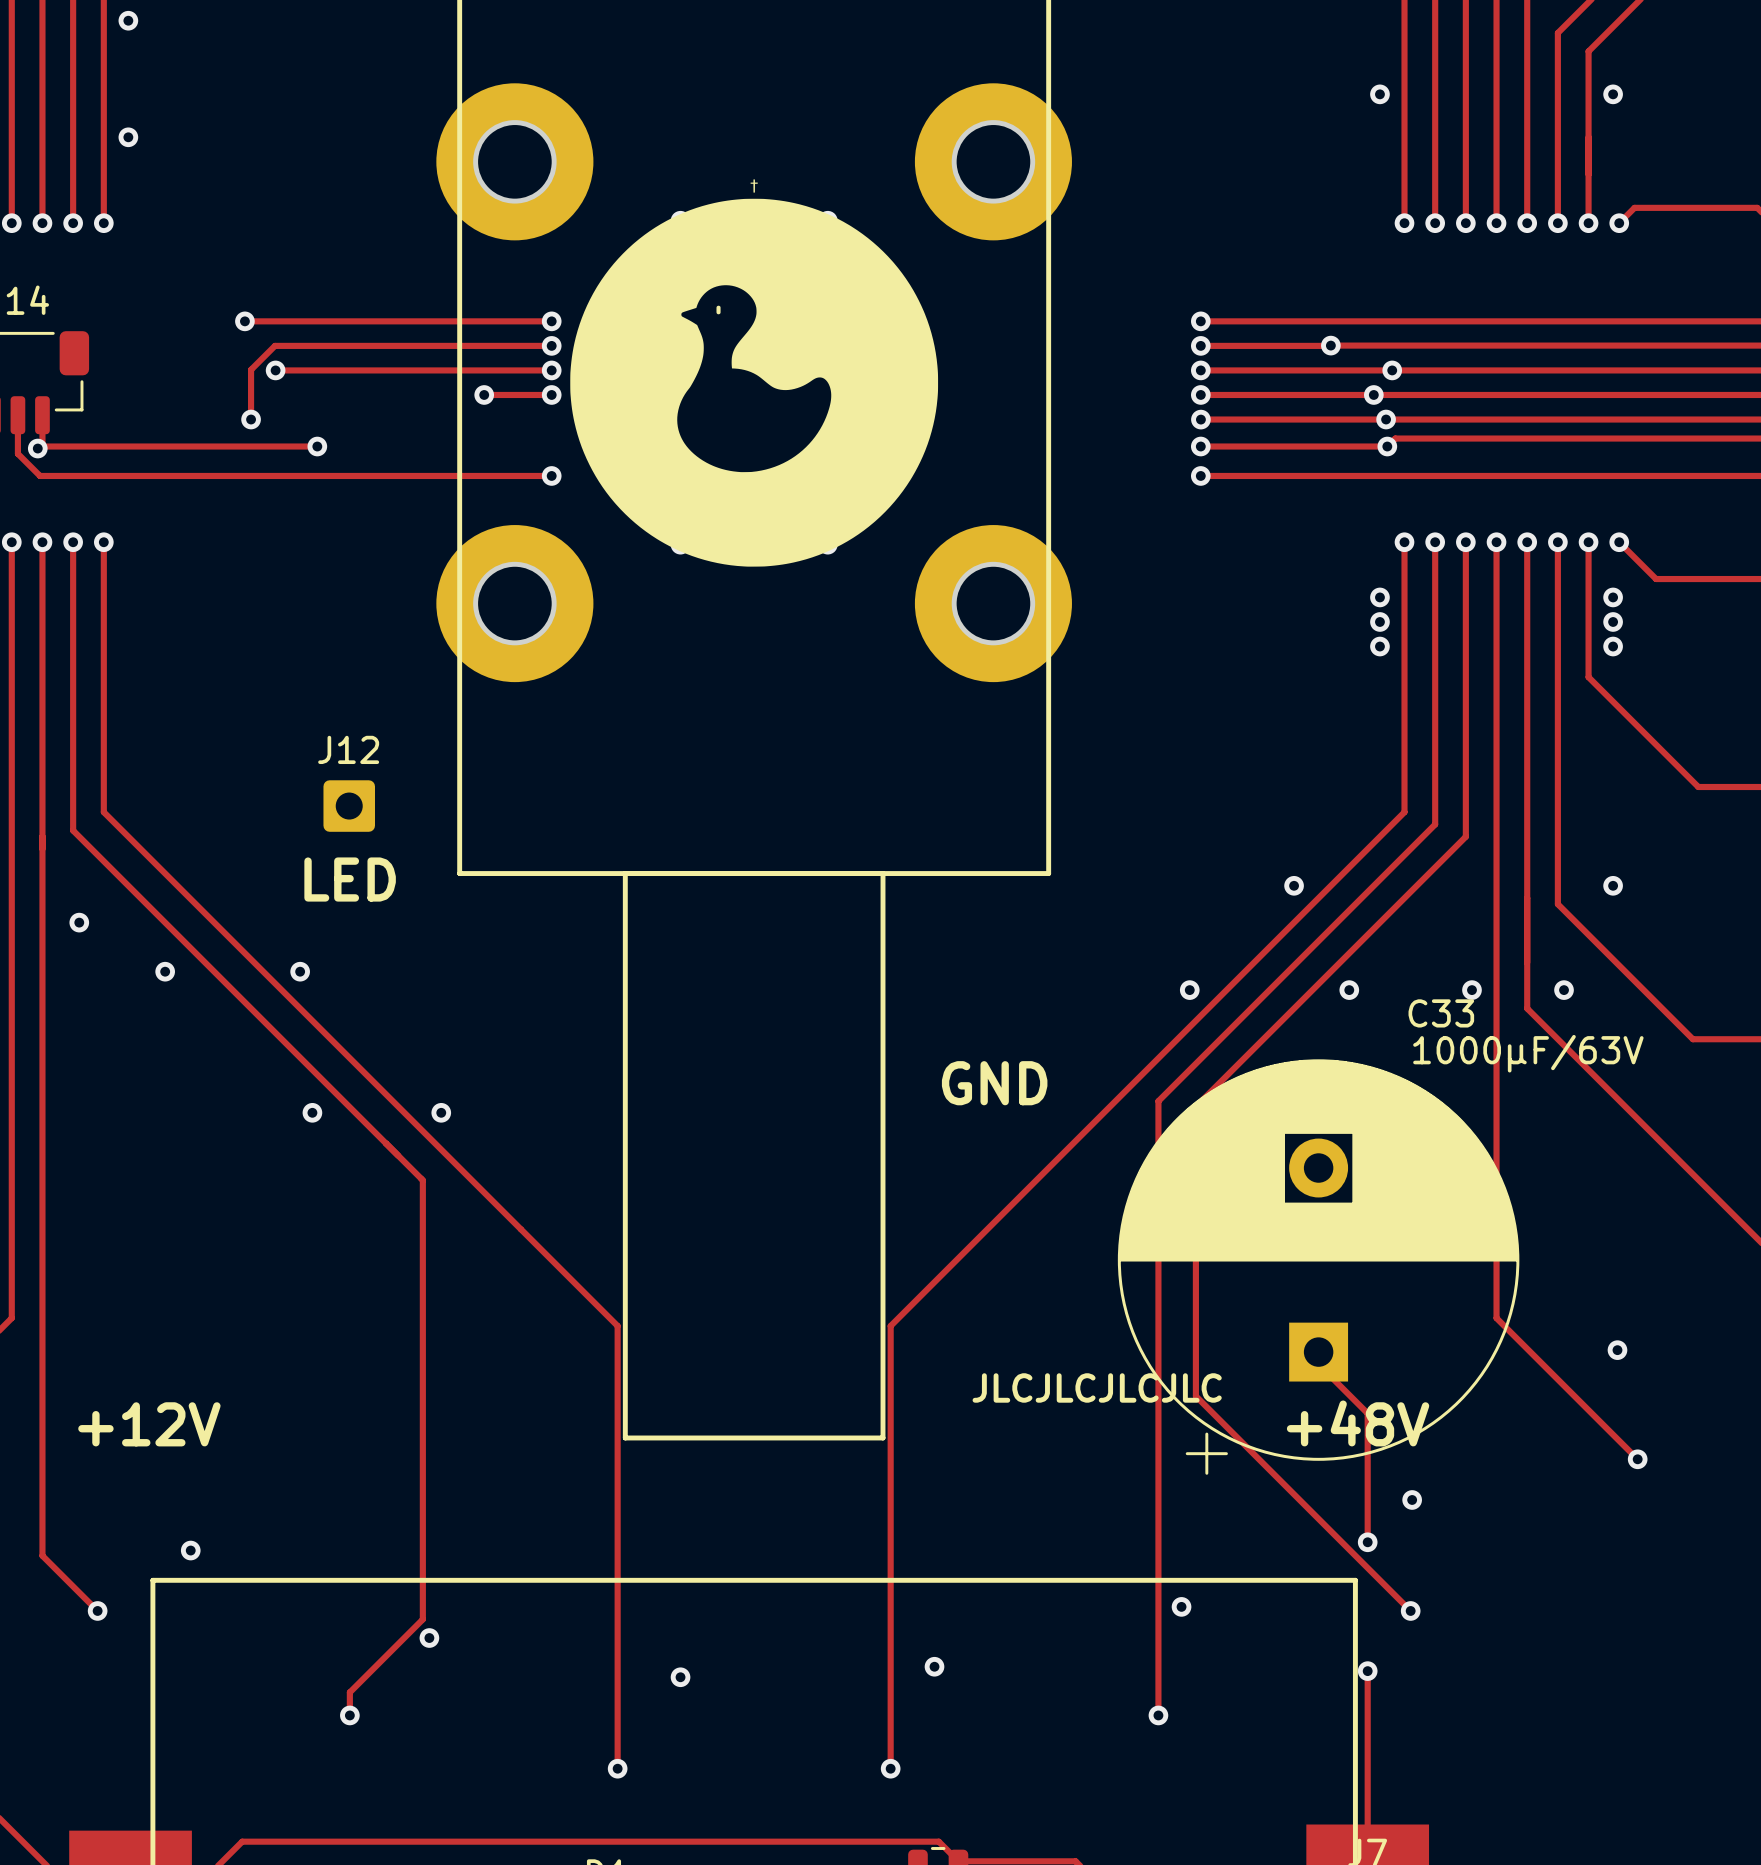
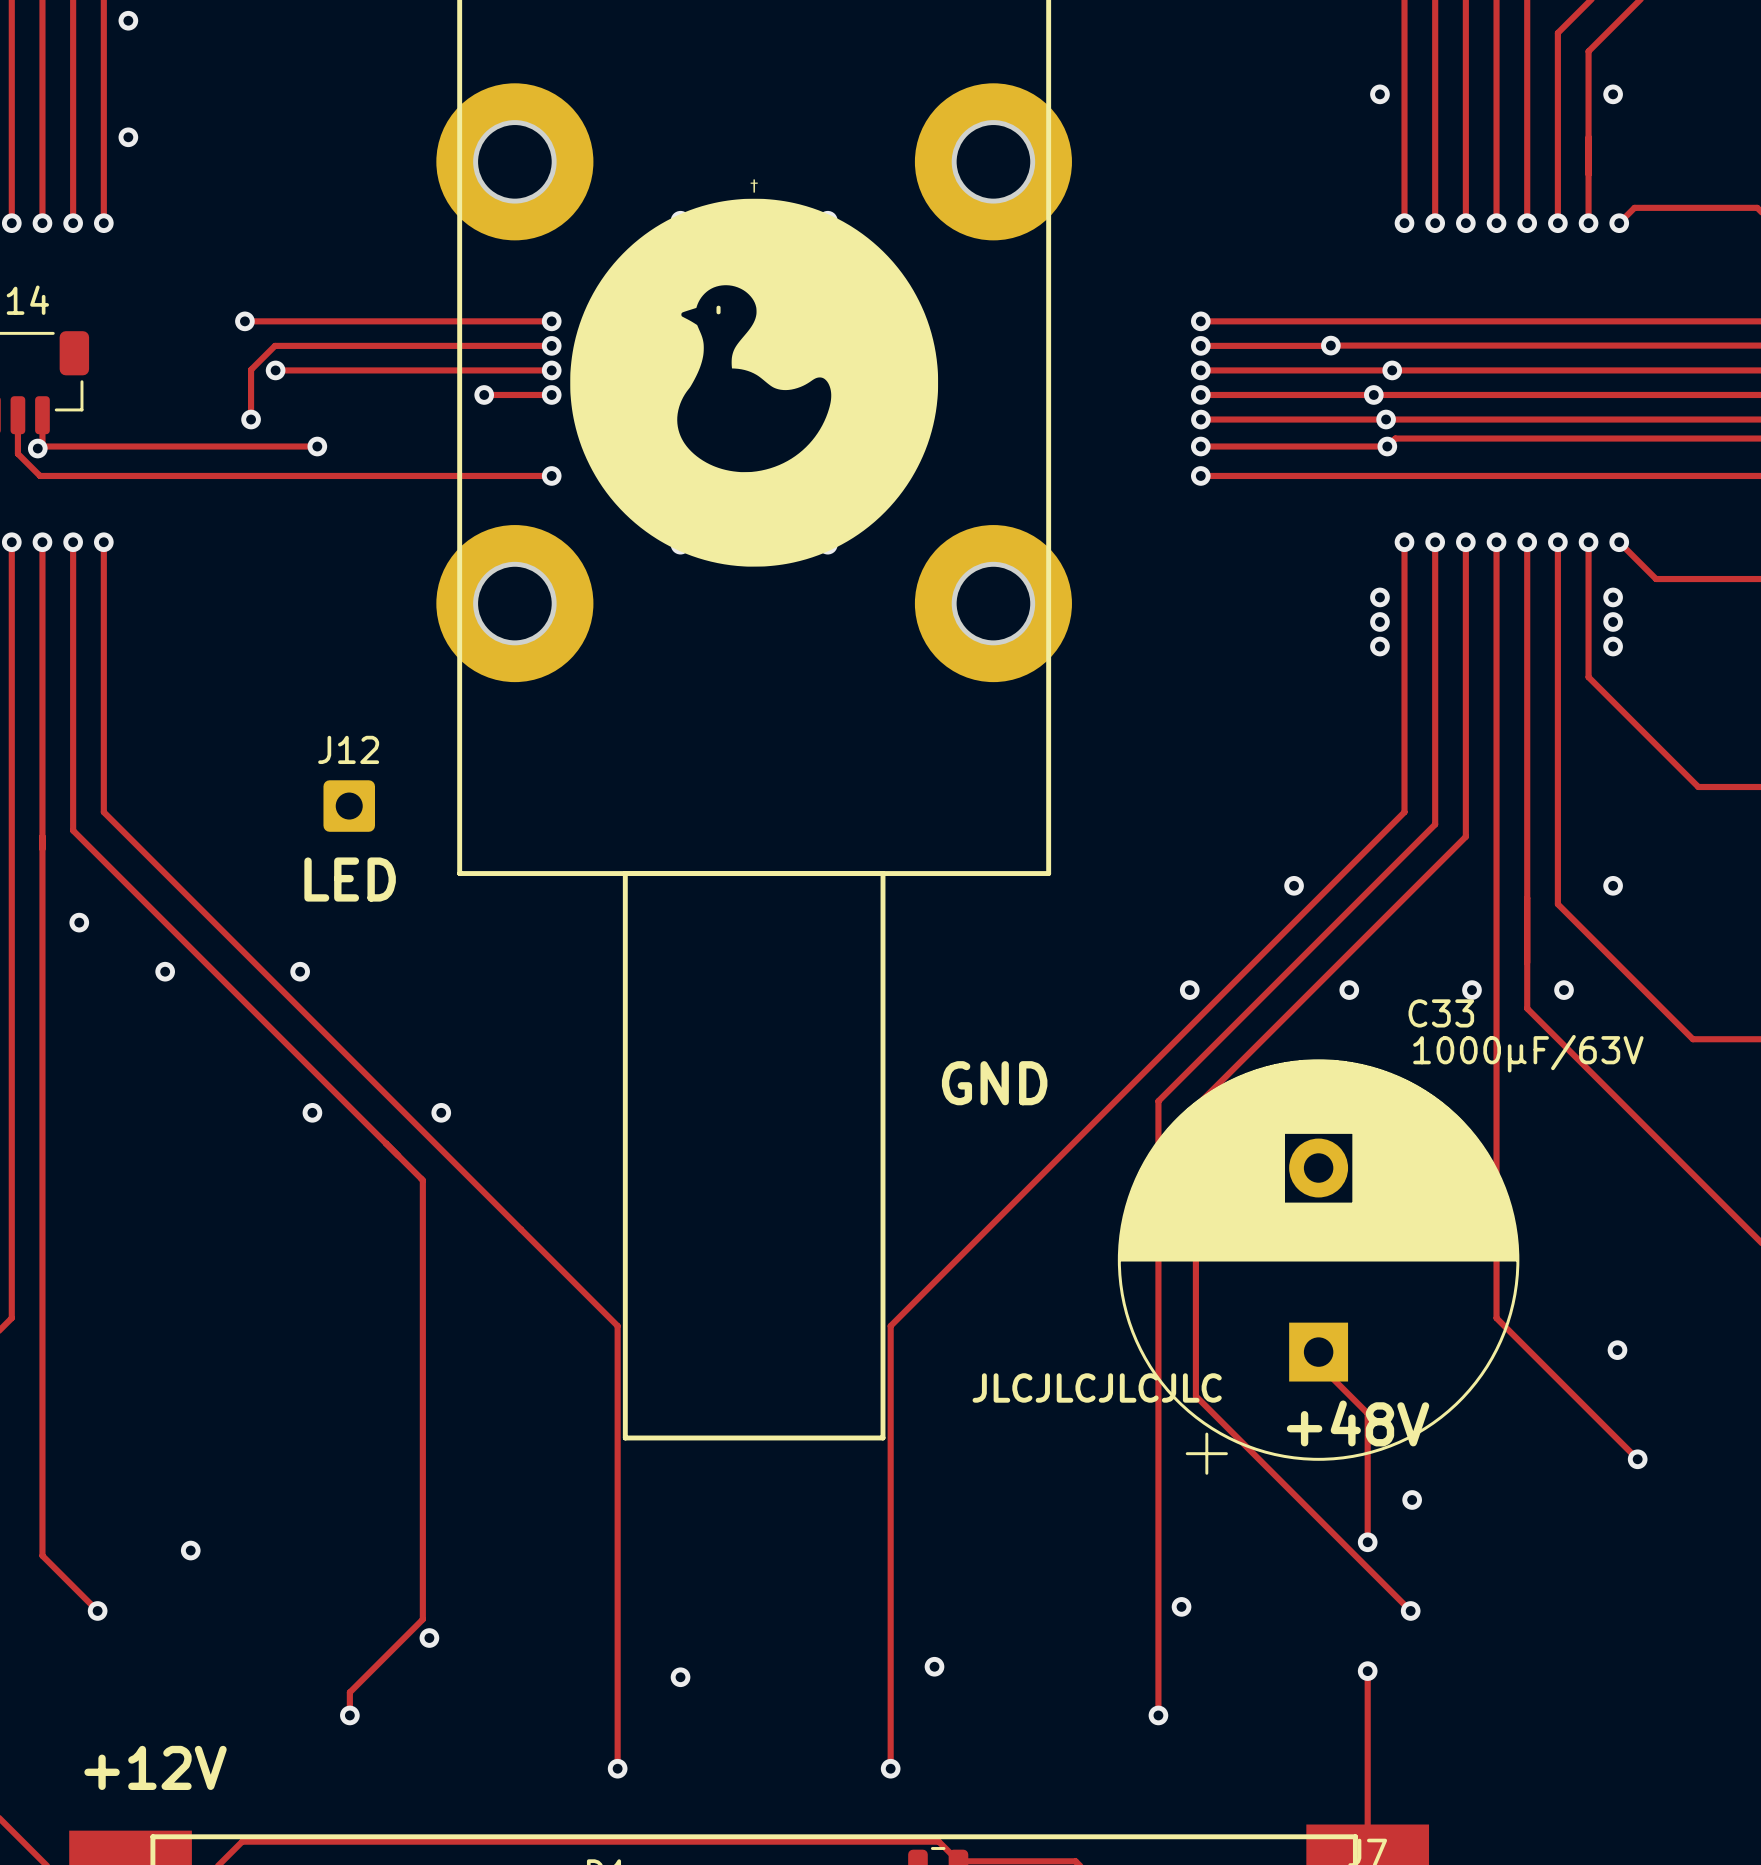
text position: +12V (149, 1424) -> +12V (155, 1767)
line: (152, 1836) (152, 1580) (1355, 1580) (1355, 1836) -> (152, 1836) (1355, 1836)

